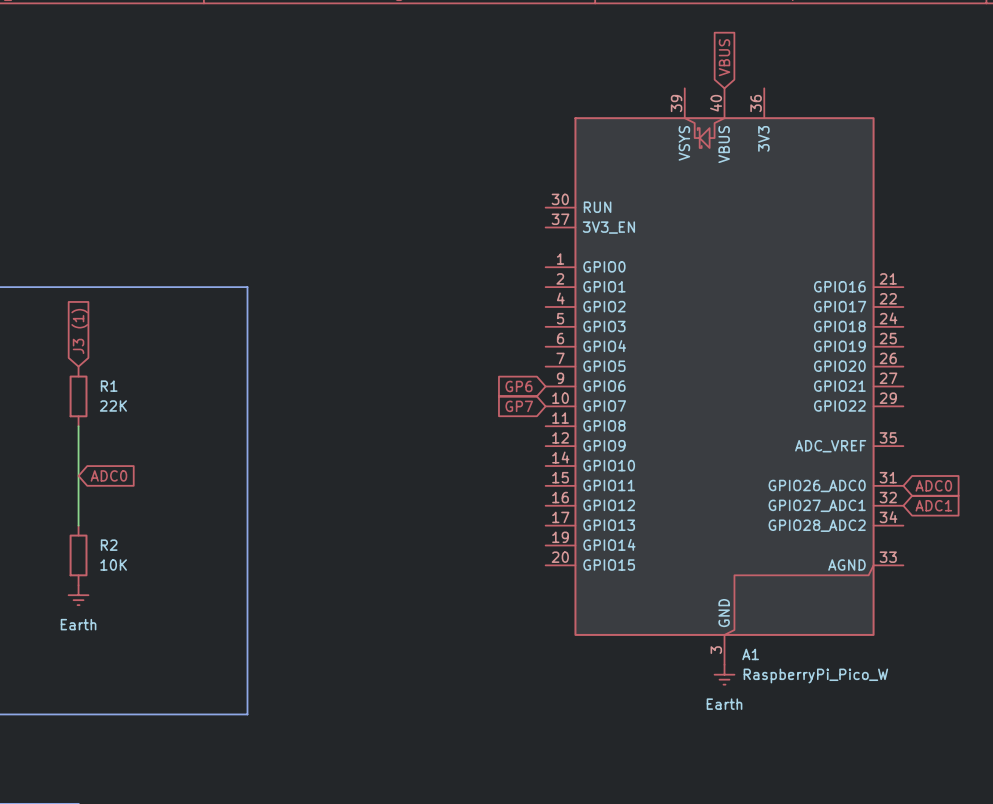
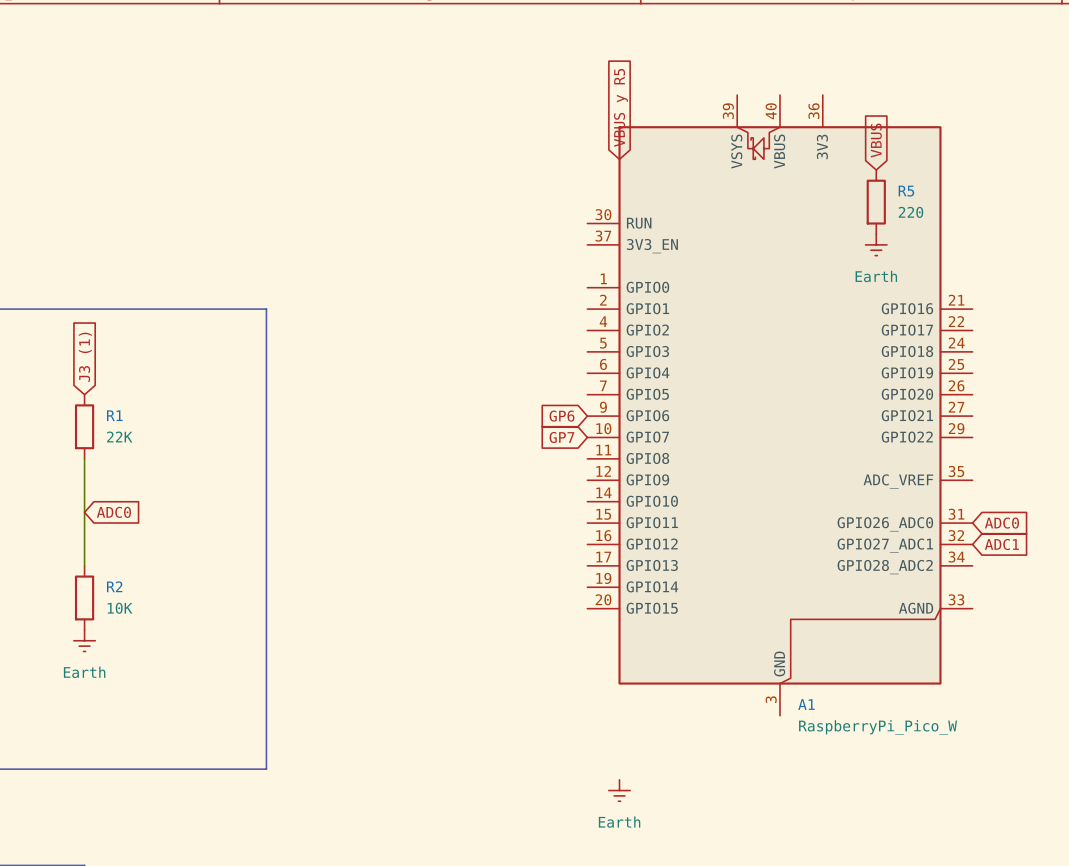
global label position: VBUS (724, 57) -> VBUS (876, 140)
global label: none -> VBUS y R5 (620, 107)
R5: none -> 220 (876, 202)
power symbol: none -> Earth (876, 244)
power symbol position: Earth (724, 674) -> Earth (619, 790)

